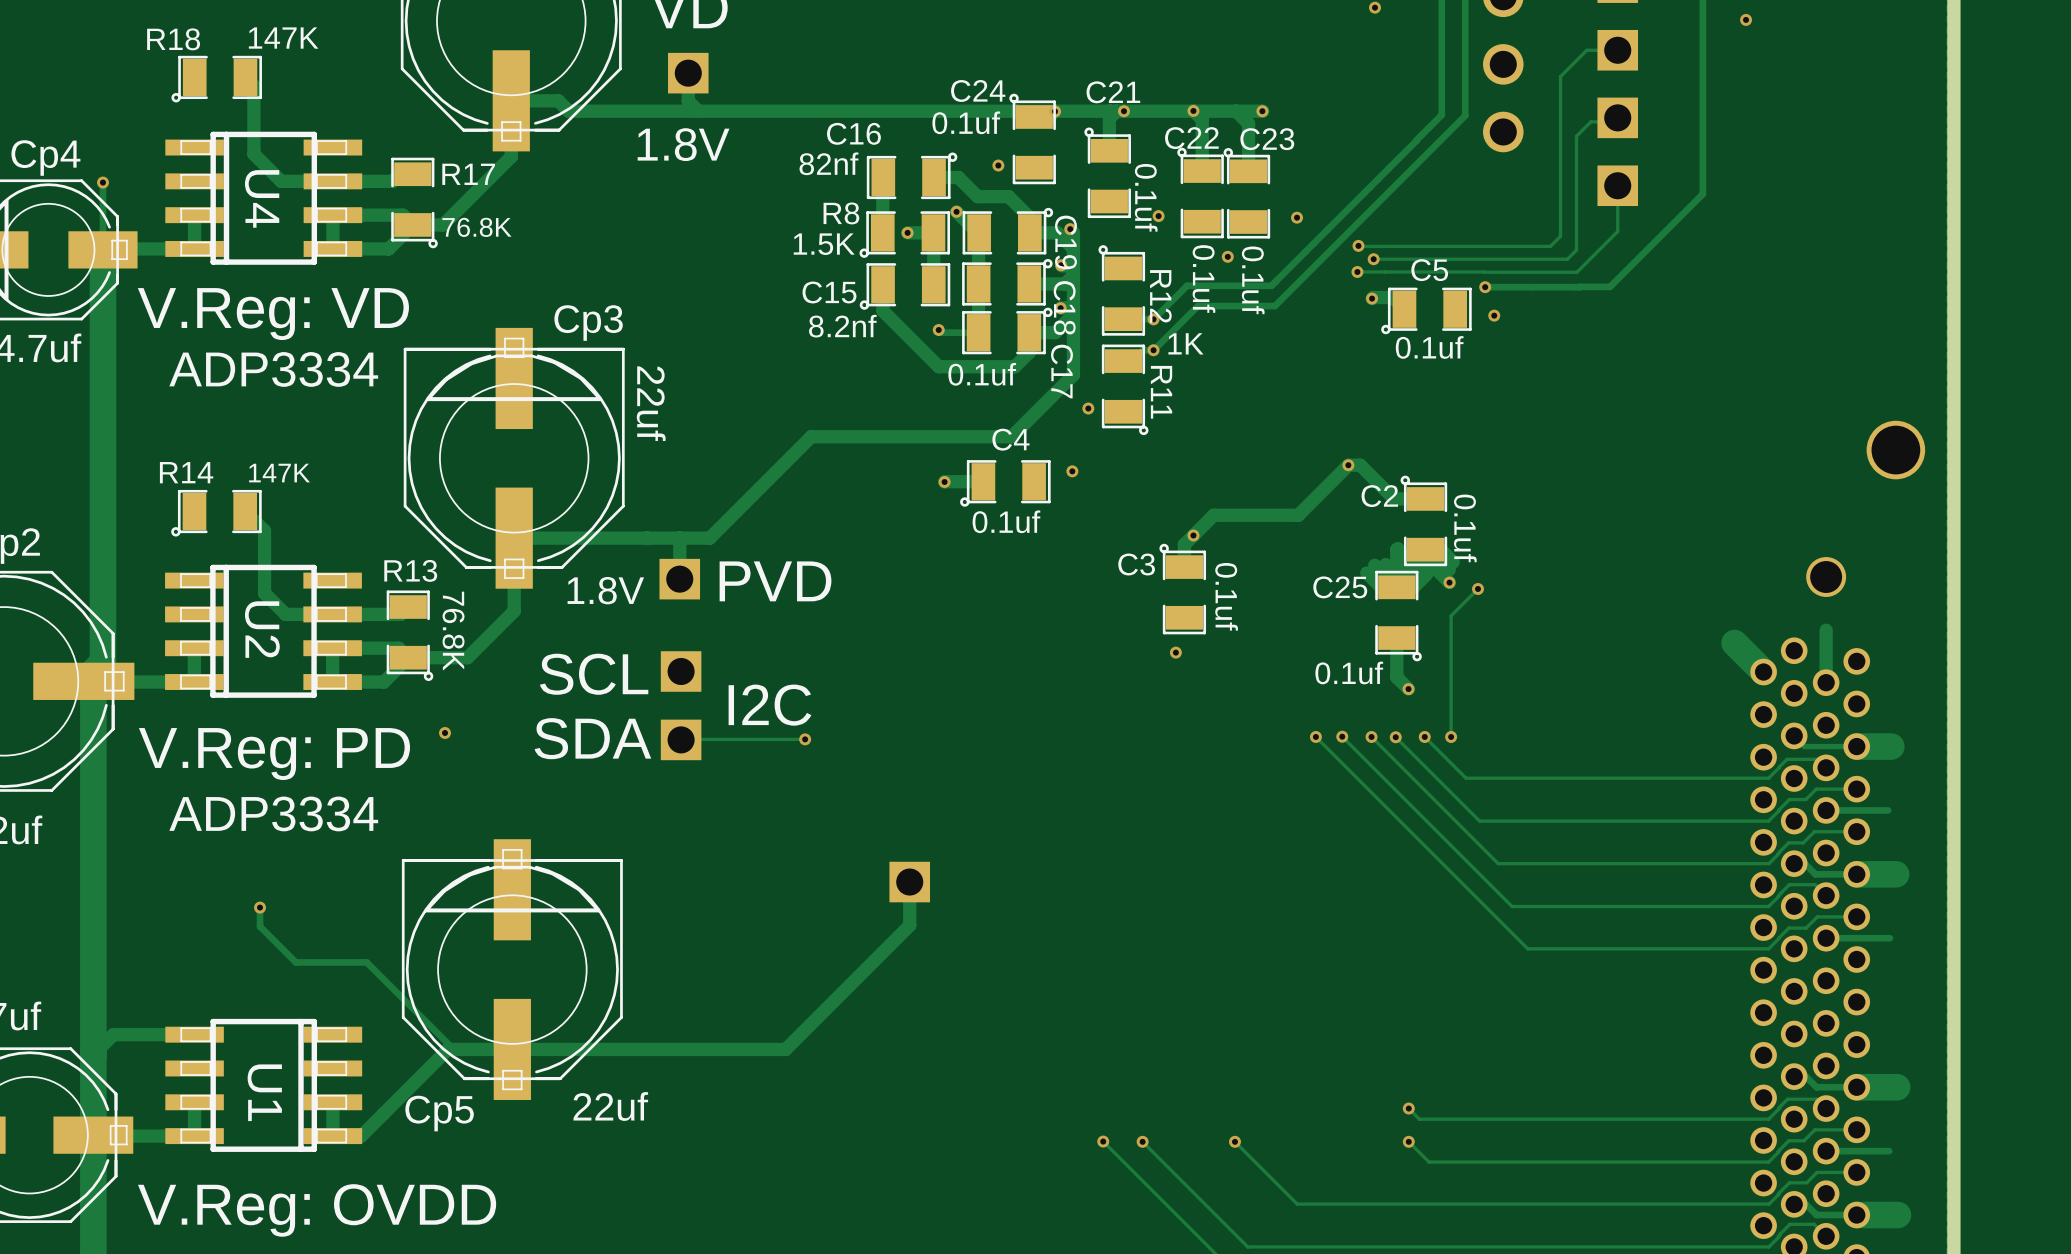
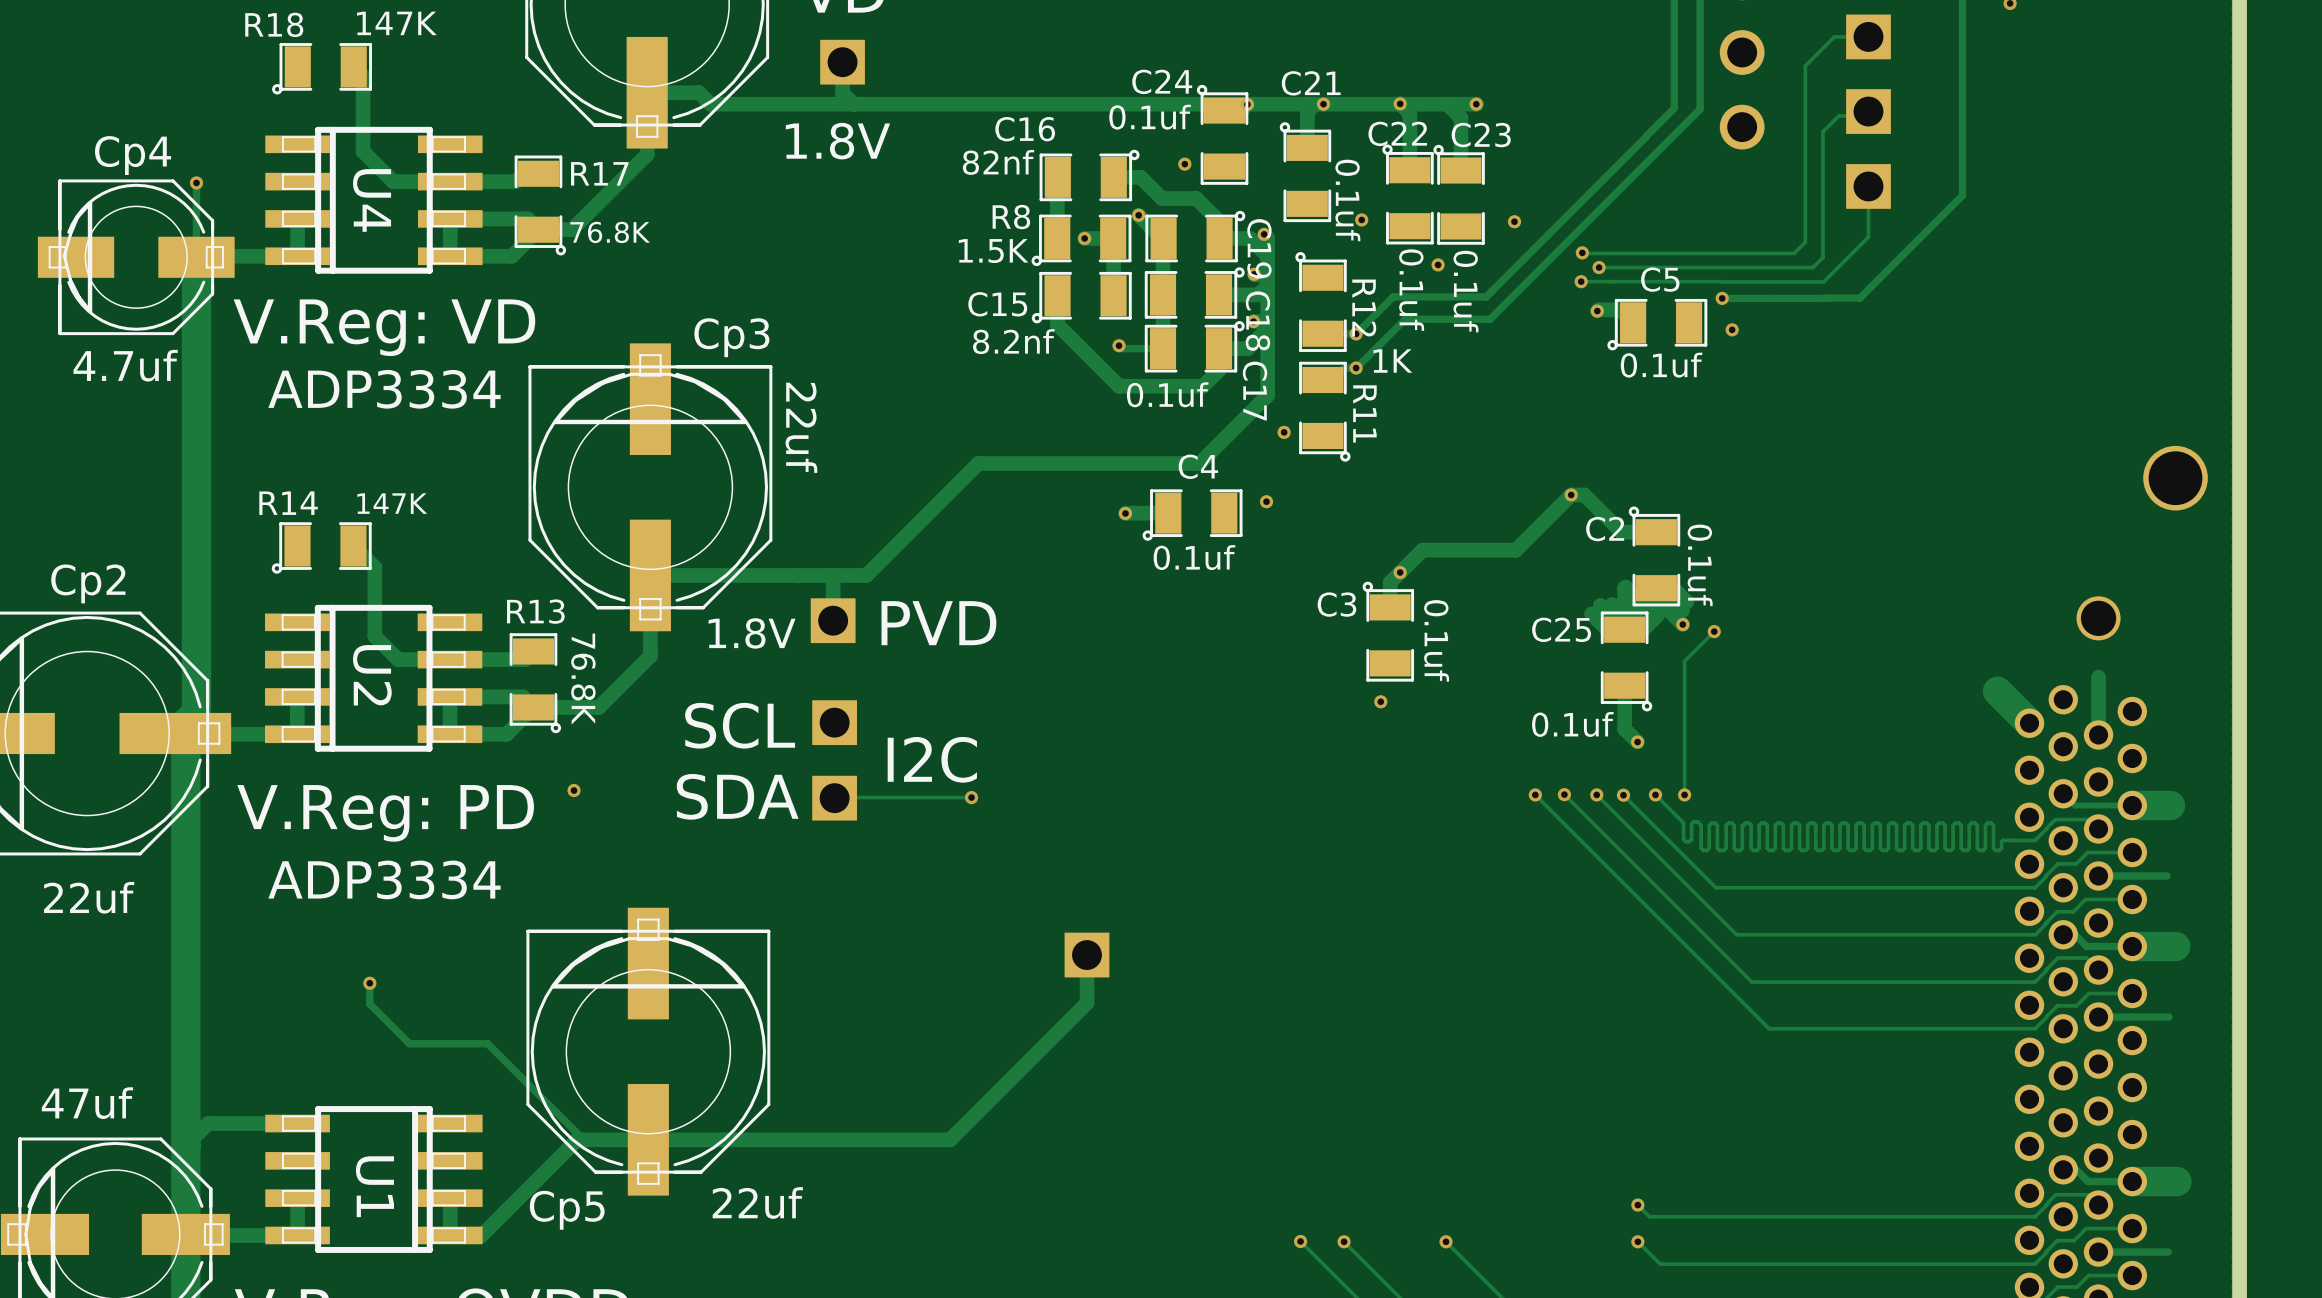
track: (1450, 762) (1466, 778) (1739, 778) -> (1683, 822) (1683, 839) (1685, 841) (1691, 839) (1691, 824) (1697, 821) (1701, 825) (1701, 848) (1703, 850) (1709, 848) (1709, 825) (1711, 823) (1717, 825) (1717, 848) (1719, 850) (1726, 848) (1726, 825) (1728, 823) (1734, 825) (1734, 848) (1736, 850) (1742, 848) (1742, 826) (1745, 823) (1751, 825) (1751, 848) (1753, 850) (1759, 848) (1759, 825) (1761, 823) (1767, 825) (1767, 848) (1769, 850) (1775, 848) (1775, 825) (1777, 823) (1783, 825) (1783, 848) (1785, 850) (1791, 848) (1791, 825) (1793, 823) (1799, 825) (1799, 848) (1801, 850) (1807, 848) (1807, 825) (1809, 823) (1815, 825) (1815, 848) (1817, 850) (1823, 848) (1823, 825) (1826, 823) (1831, 825) (1831, 848) (1834, 850) (1840, 848) (1840, 825) (1842, 823) (1848, 825) (1848, 848) (1850, 850) (1856, 848) (1856, 825) (1858, 823) (1864, 825) (1864, 848) (1866, 850) (1872, 848) (1872, 825) (1874, 823) (1880, 825) (1880, 848) (1882, 850) (1888, 848) (1888, 825) (1890, 823) (1896, 825) (1896, 848) (1898, 850) (1904, 848) (1904, 825) (1906, 823) (1912, 825) (1912, 848) (1914, 850) (1920, 848) (1920, 825) (1923, 823) (1928, 825) (1928, 848) (1931, 850) (1936, 848) (1936, 825) (1939, 823) (1945, 825) (1945, 848) (1947, 850) (1953, 848) (1953, 825) (1955, 823) (1961, 825) (1961, 848) (1963, 850) (1969, 848) (1969, 825) (1971, 823) (1977, 825) (1977, 848) (1979, 850) (1985, 848) (1985, 825) (1987, 823) (1993, 825) (1993, 848) (1995, 850) (2001, 848) (2002, 840)

